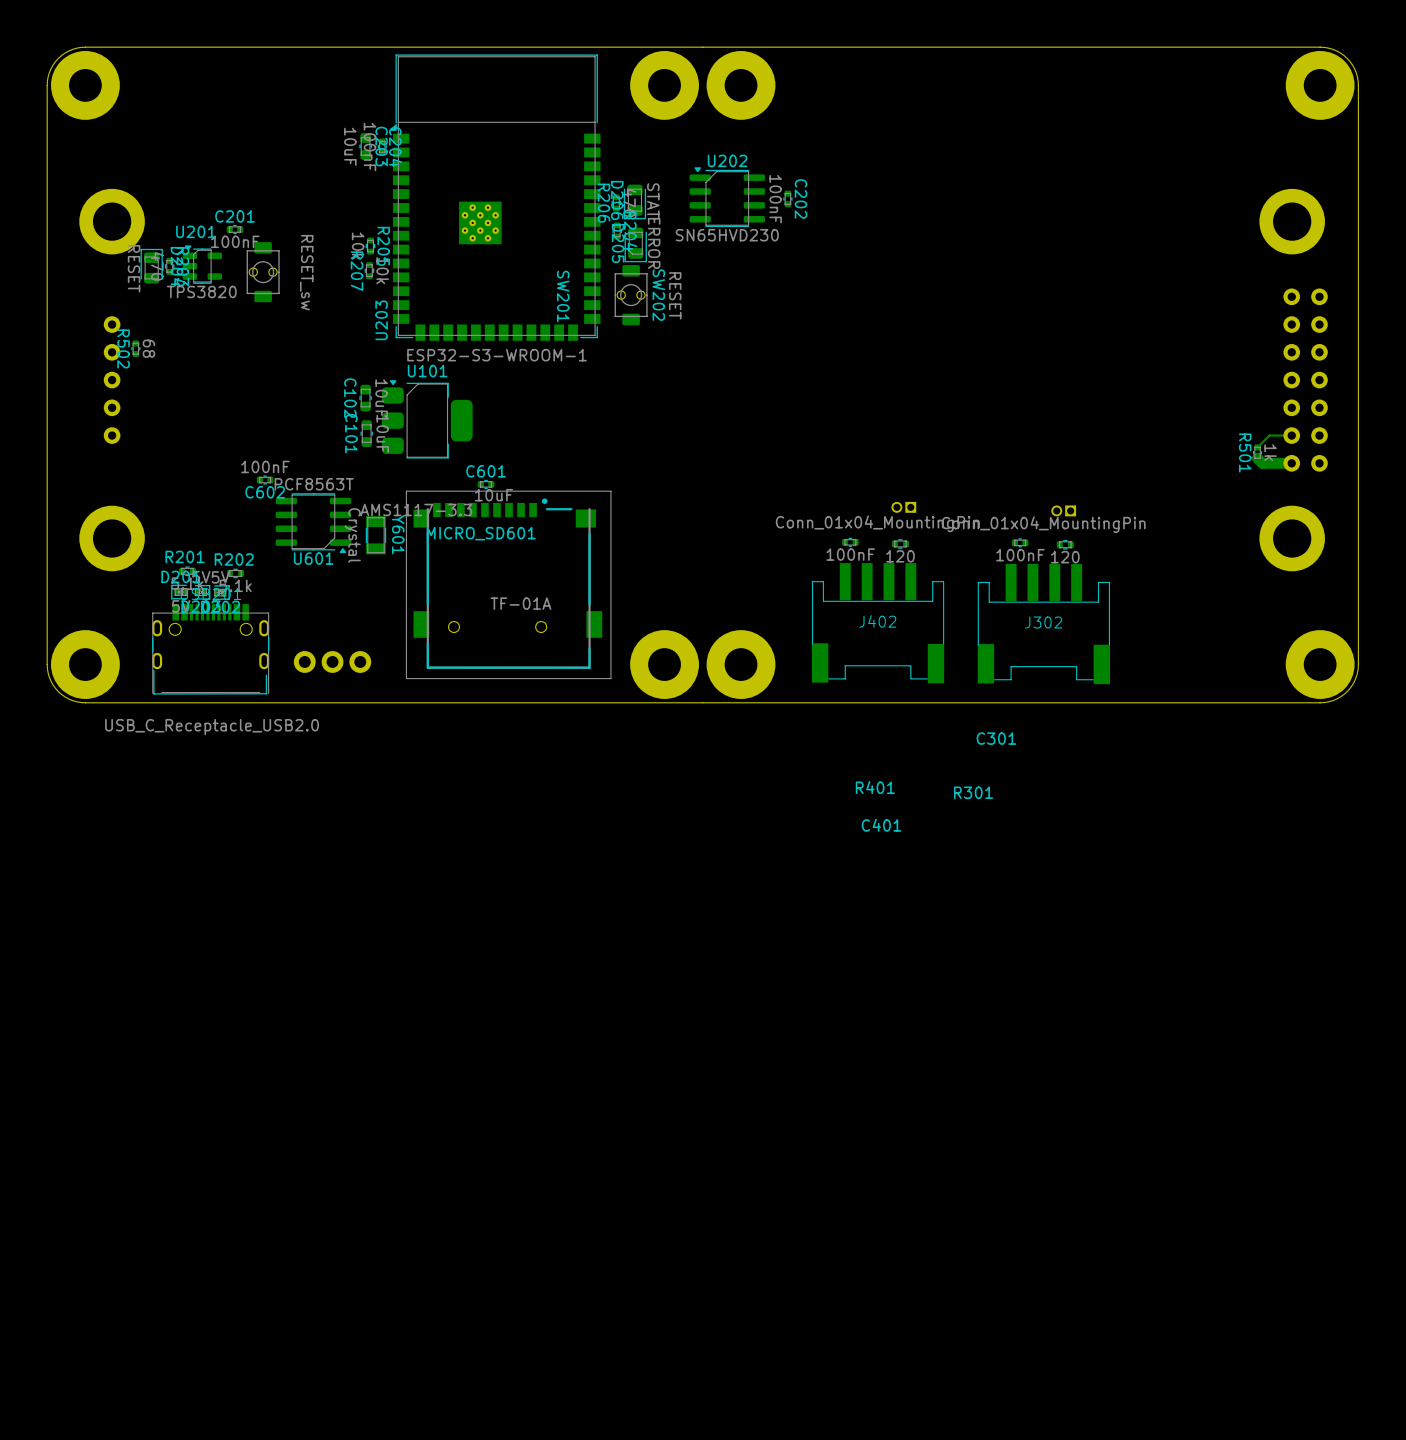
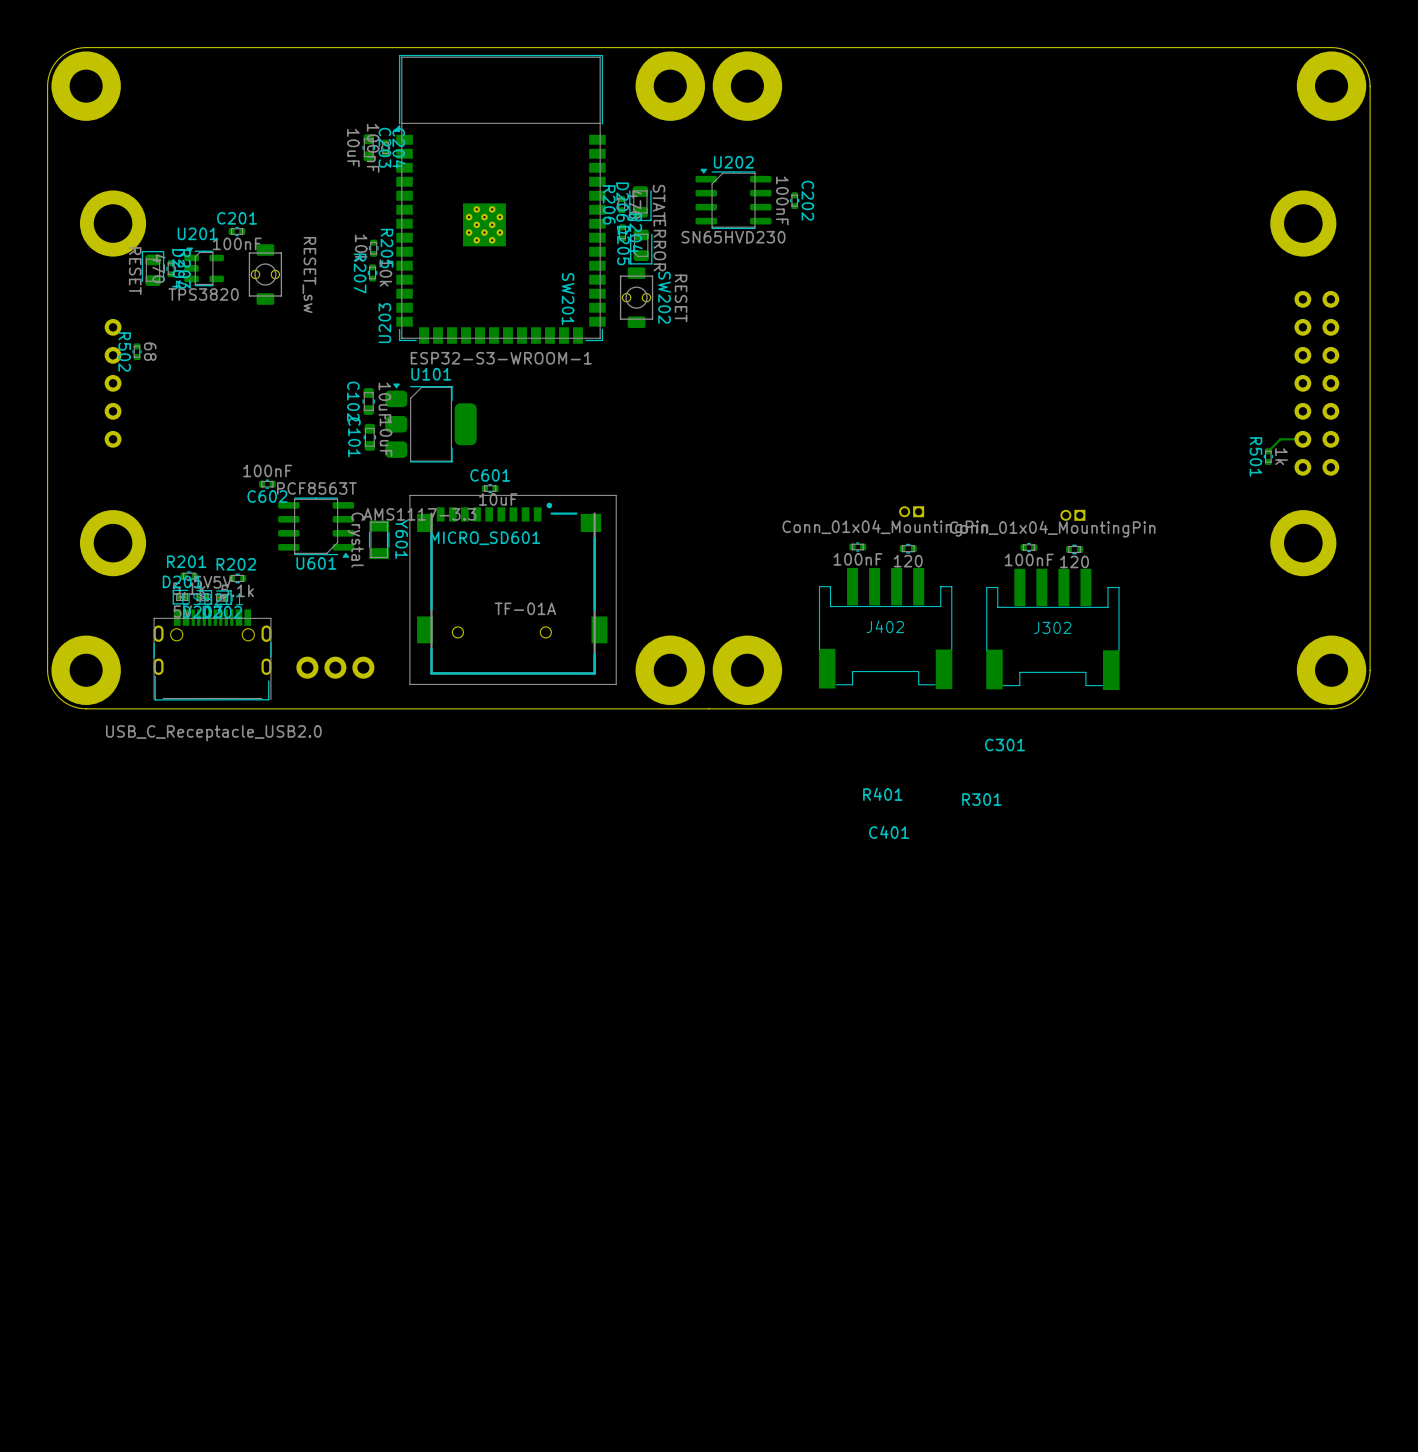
track: (1257, 458) (1262, 463) (1291, 463) -> none

